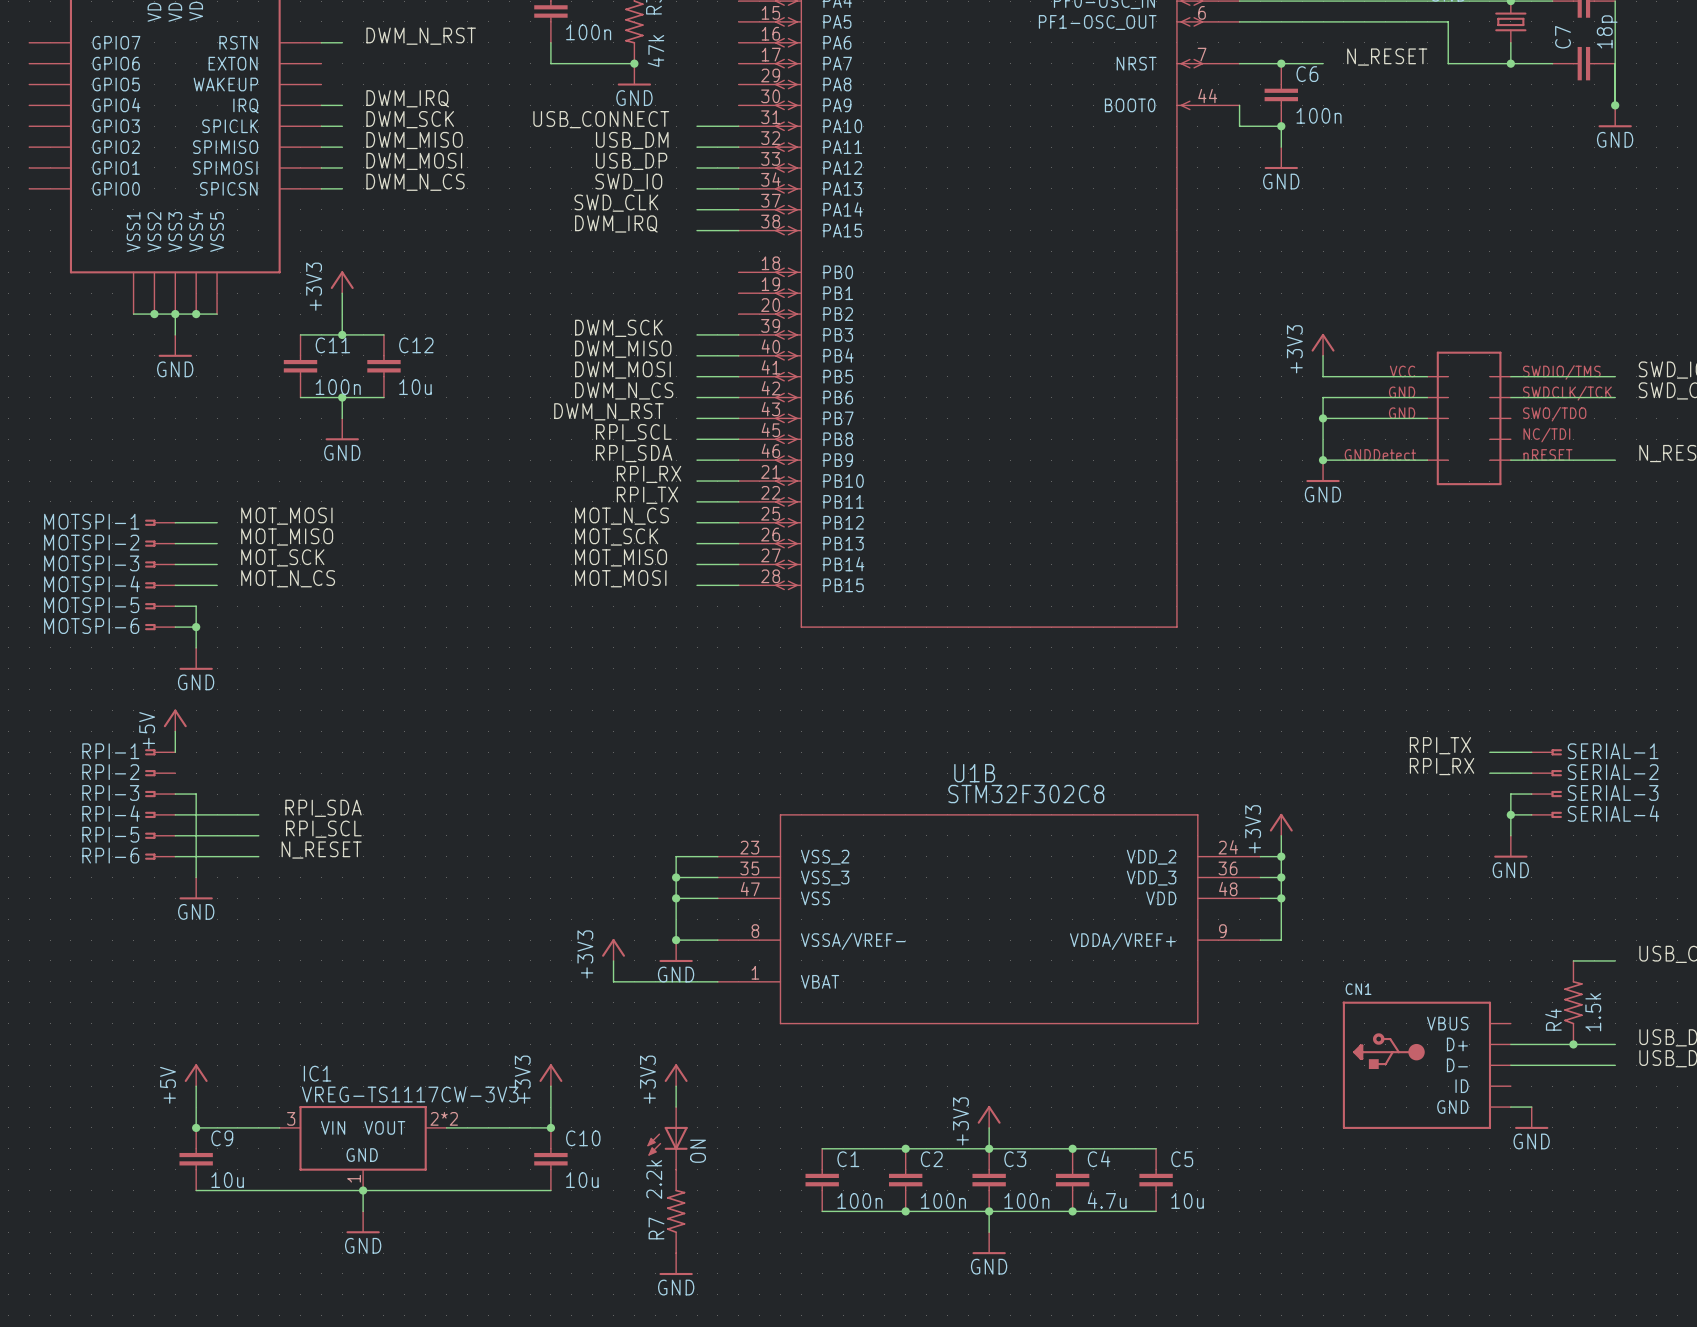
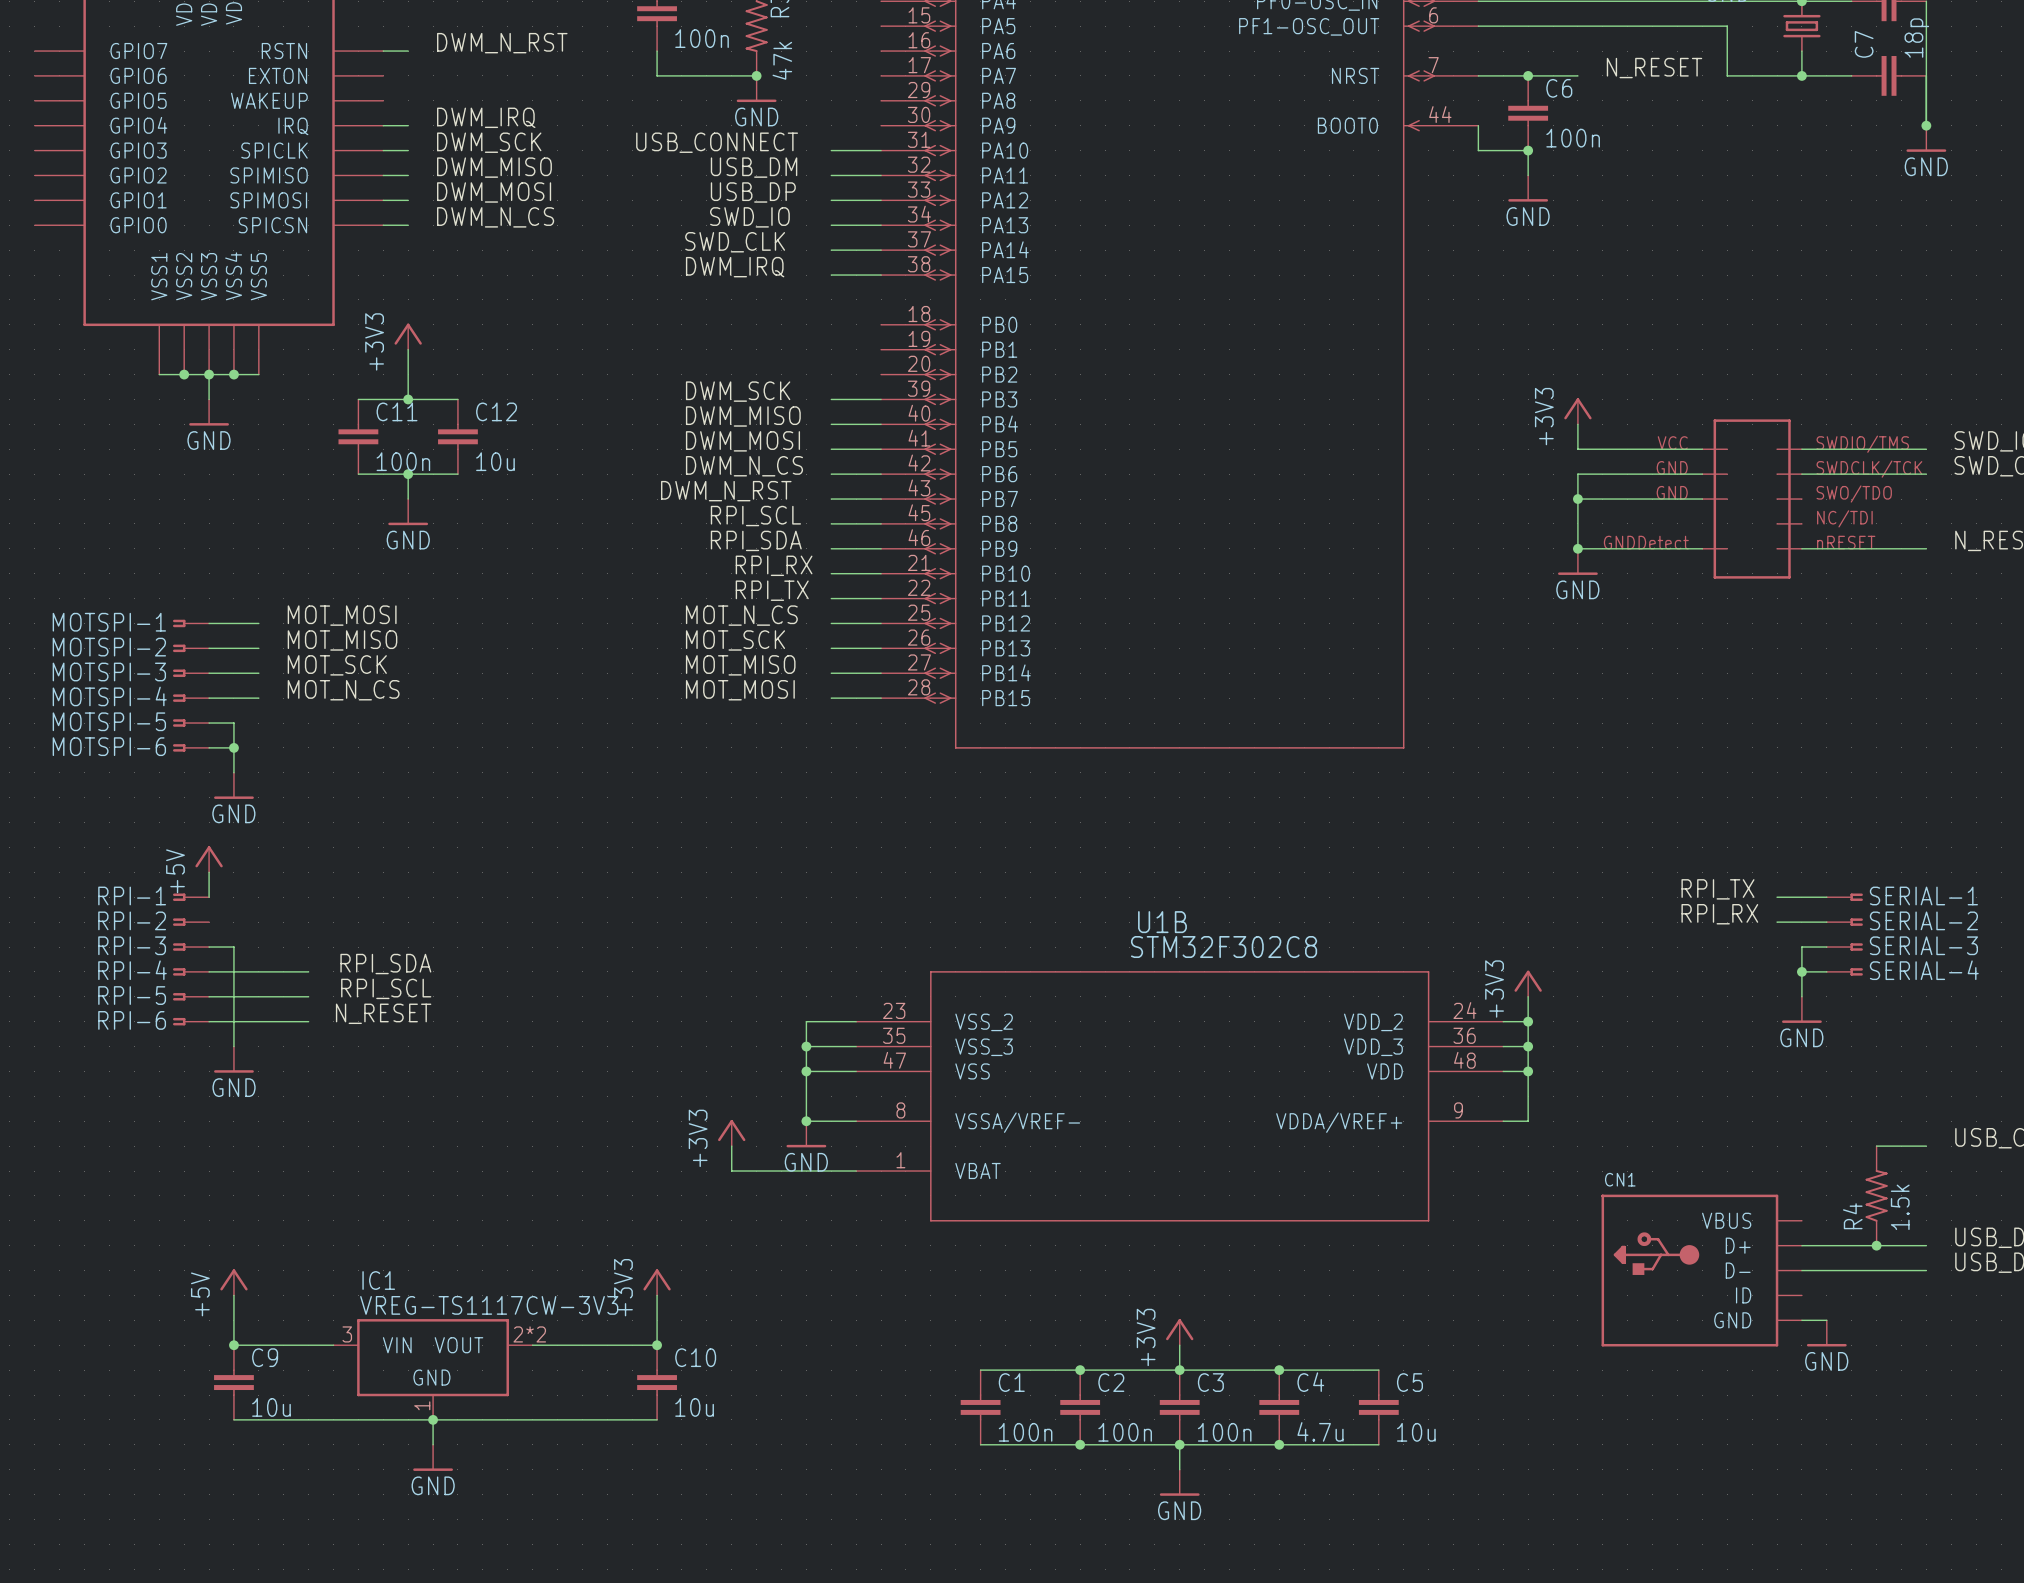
power symbol: +3V3 (676, 1075) -> none
wire: (676, 1086) (676, 1107) -> none
ON: (667, 1138) -> none
R7: 2.2k (676, 1211) -> none
power symbol: GND (676, 1264) -> none

